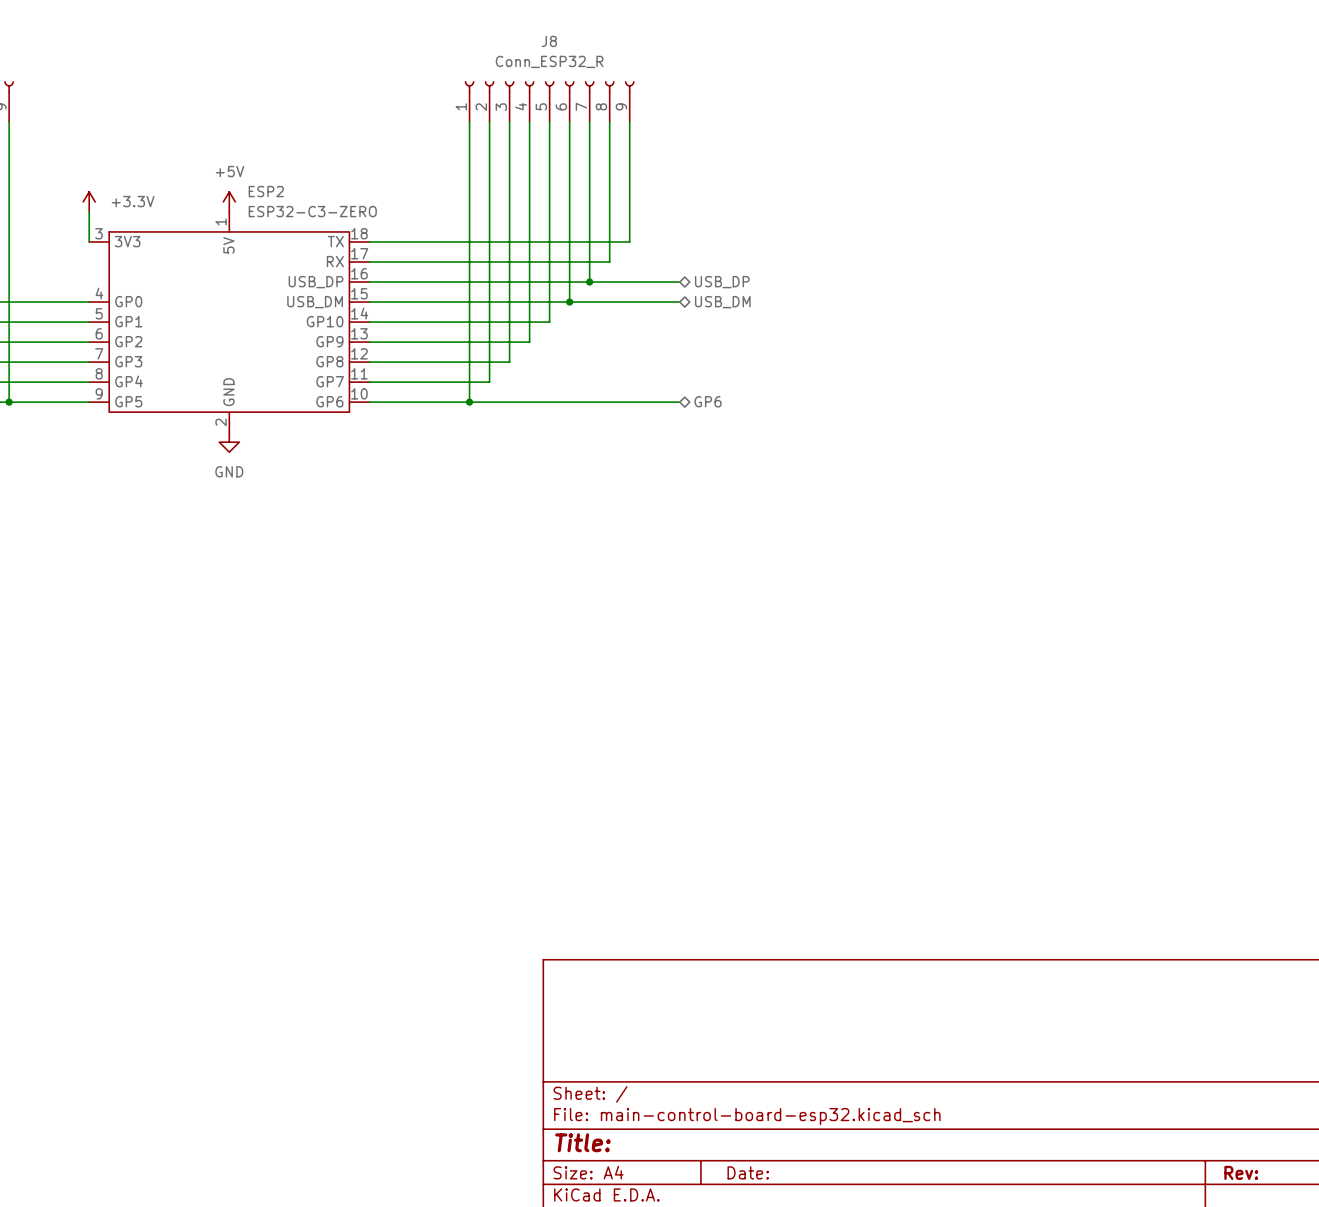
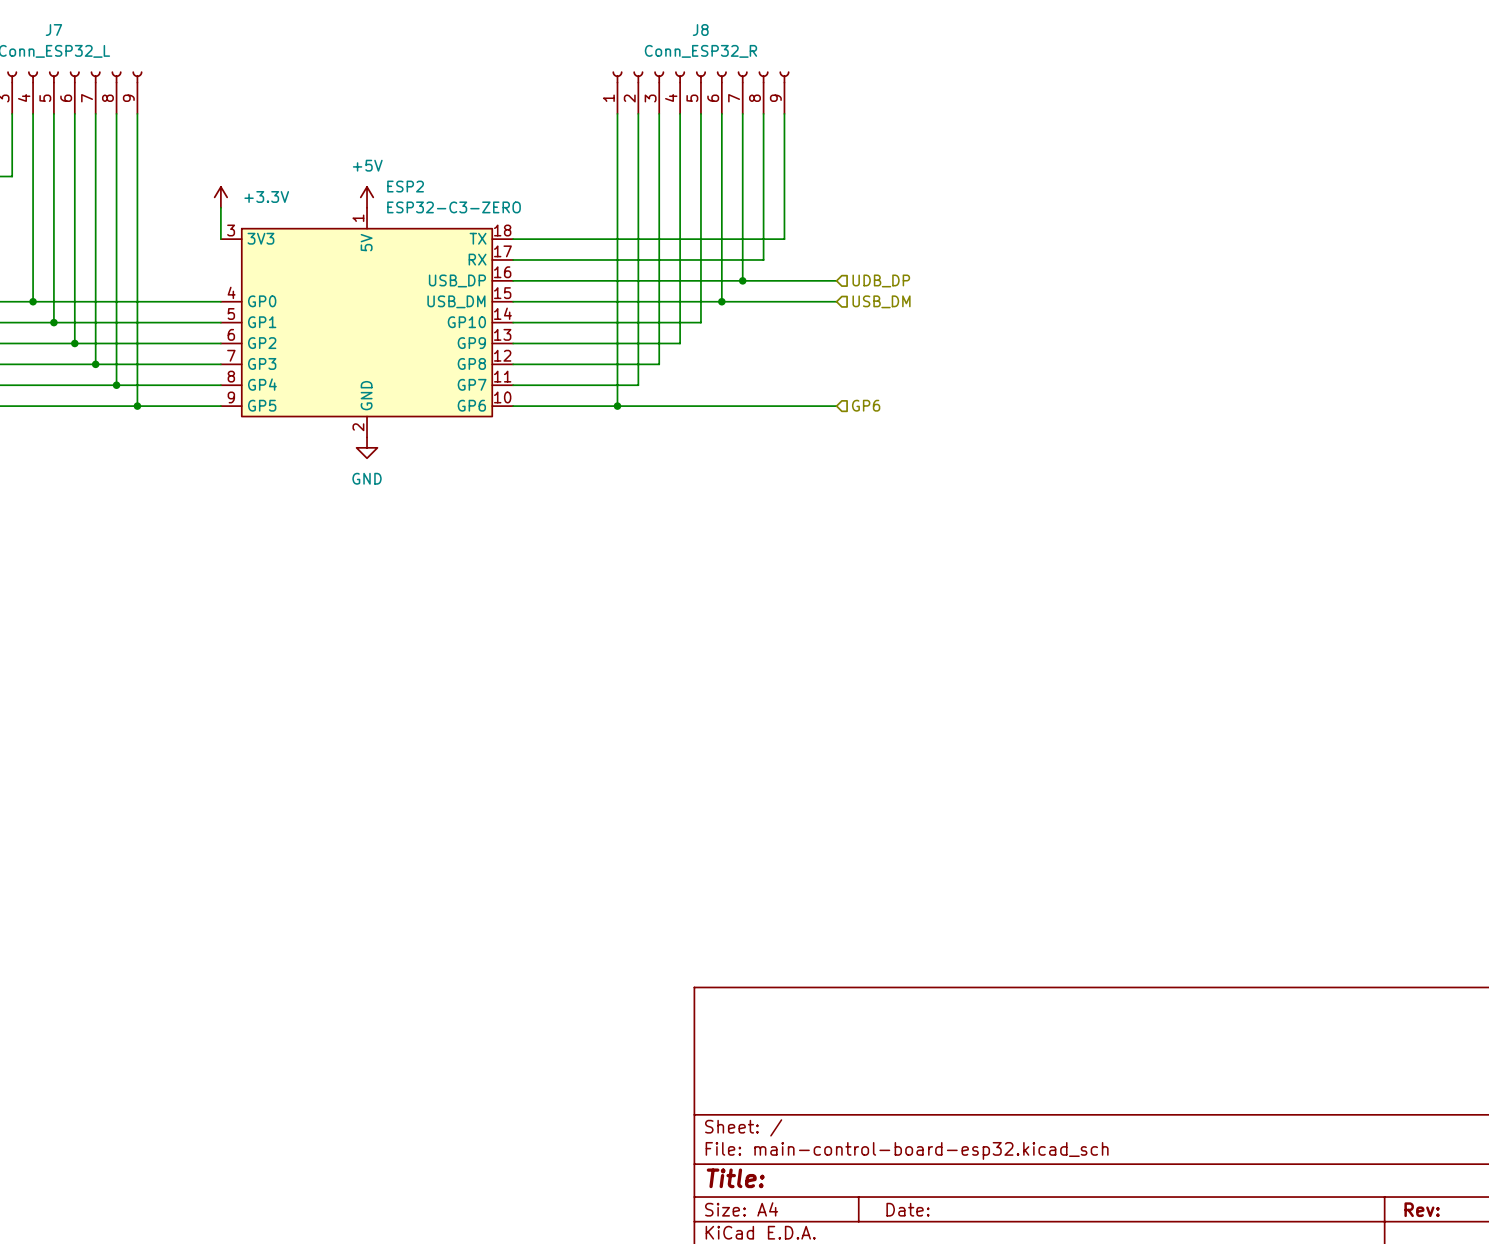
hierarchical label shape: bidirectional (722, 282) -> input (881, 280)
hierarchical label: USB_DP (722, 282) -> UDB_DP (881, 280)
hierarchical label shape: bidirectional (722, 302) -> input (881, 301)
hierarchical label shape: bidirectional (708, 401) -> input (866, 405)

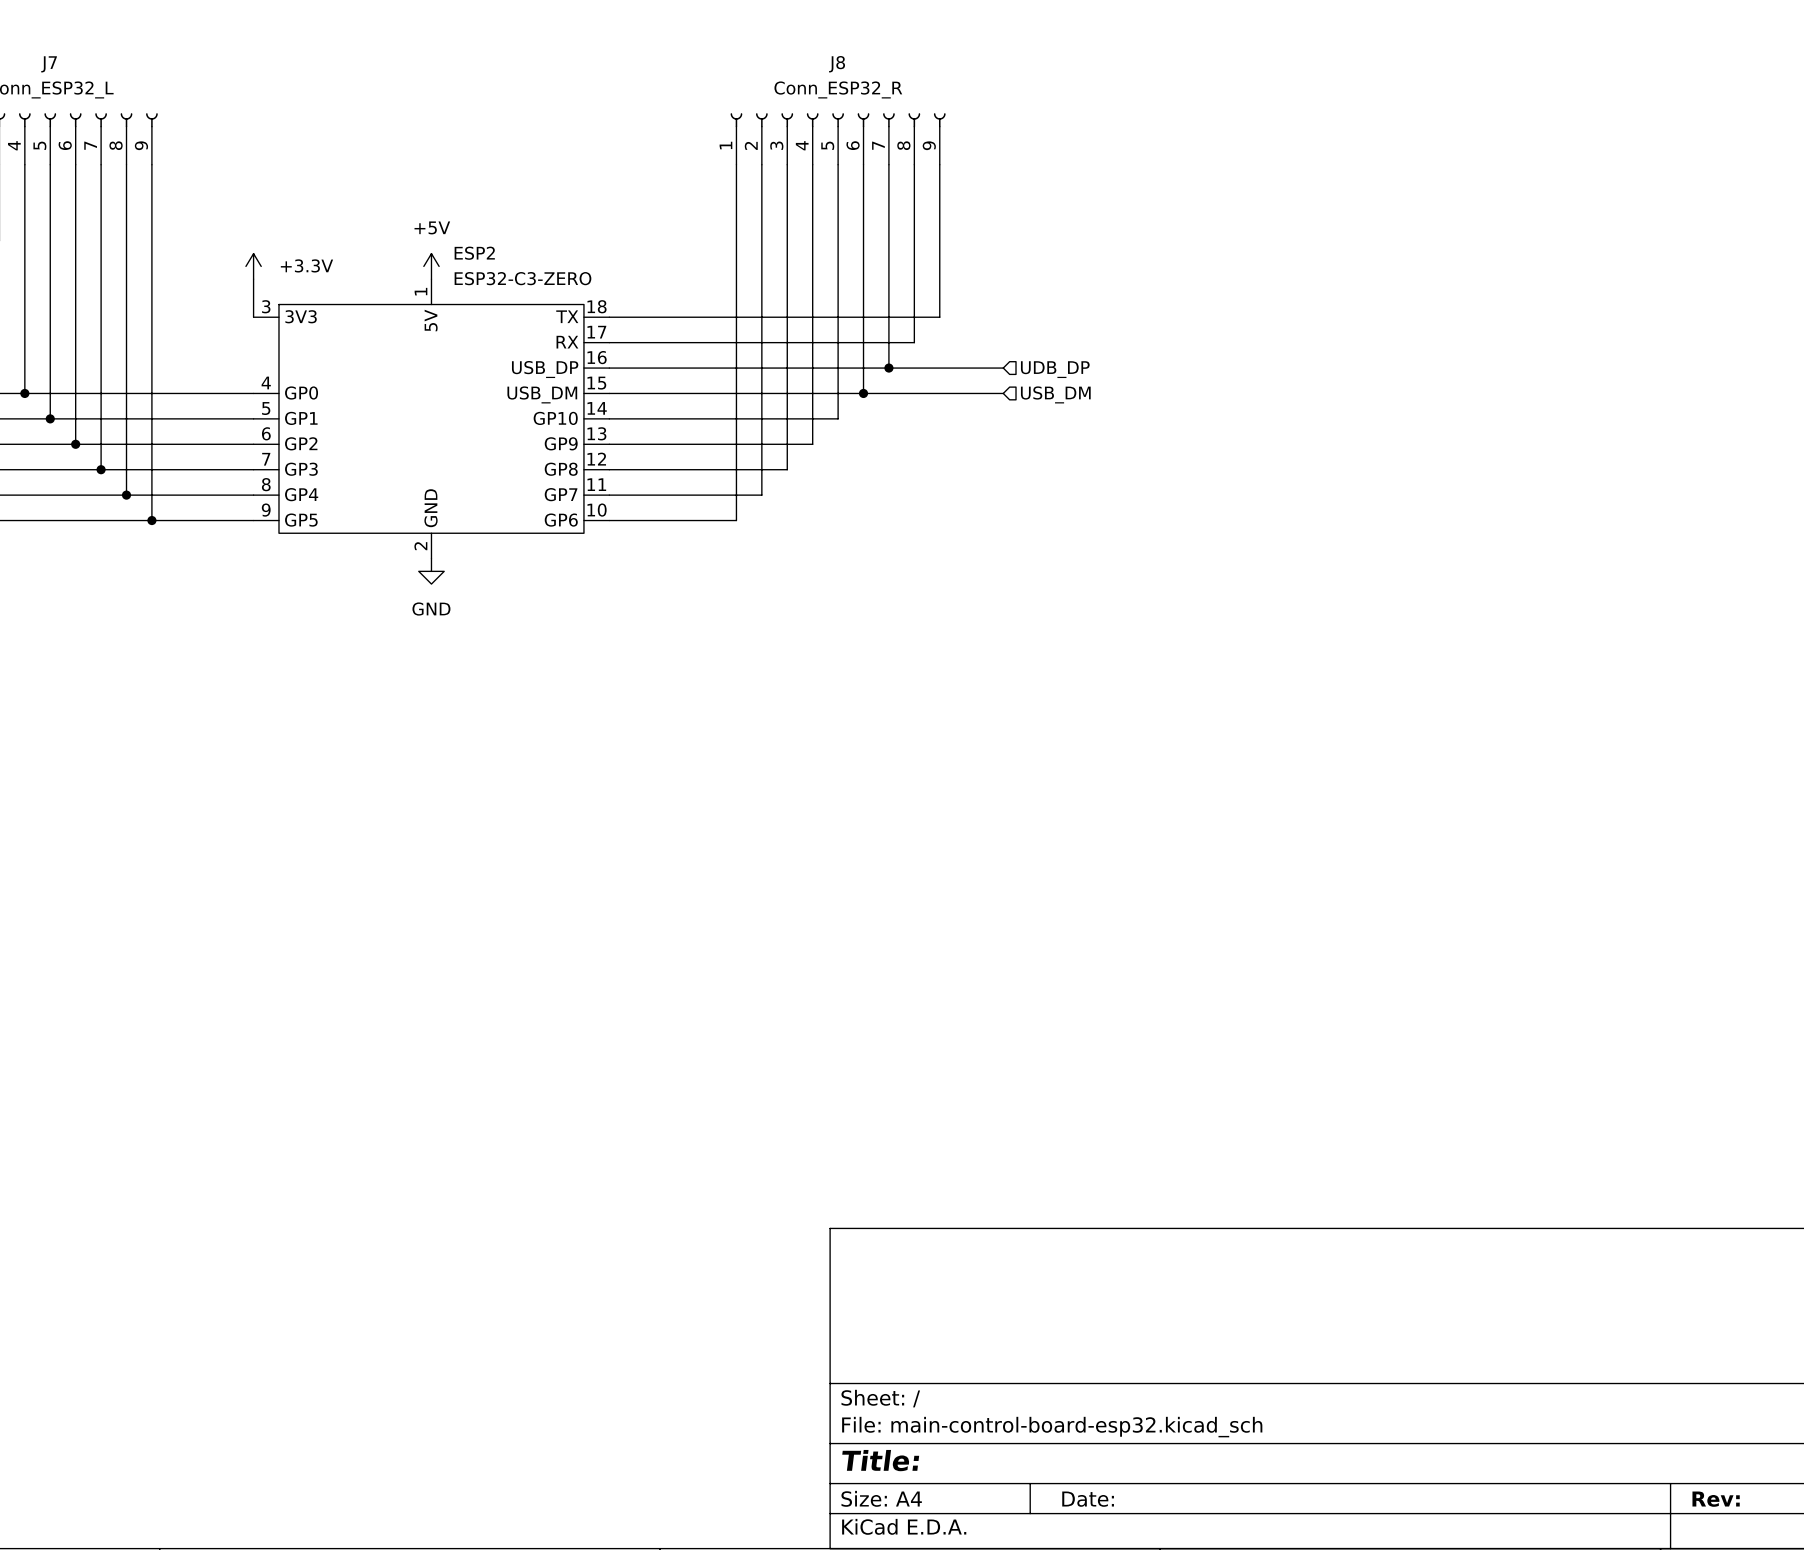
hierarchical label: GP6 (866, 405) -> none
wire: (617, 406) (836, 406) -> none
junction: (617, 406) -> none

